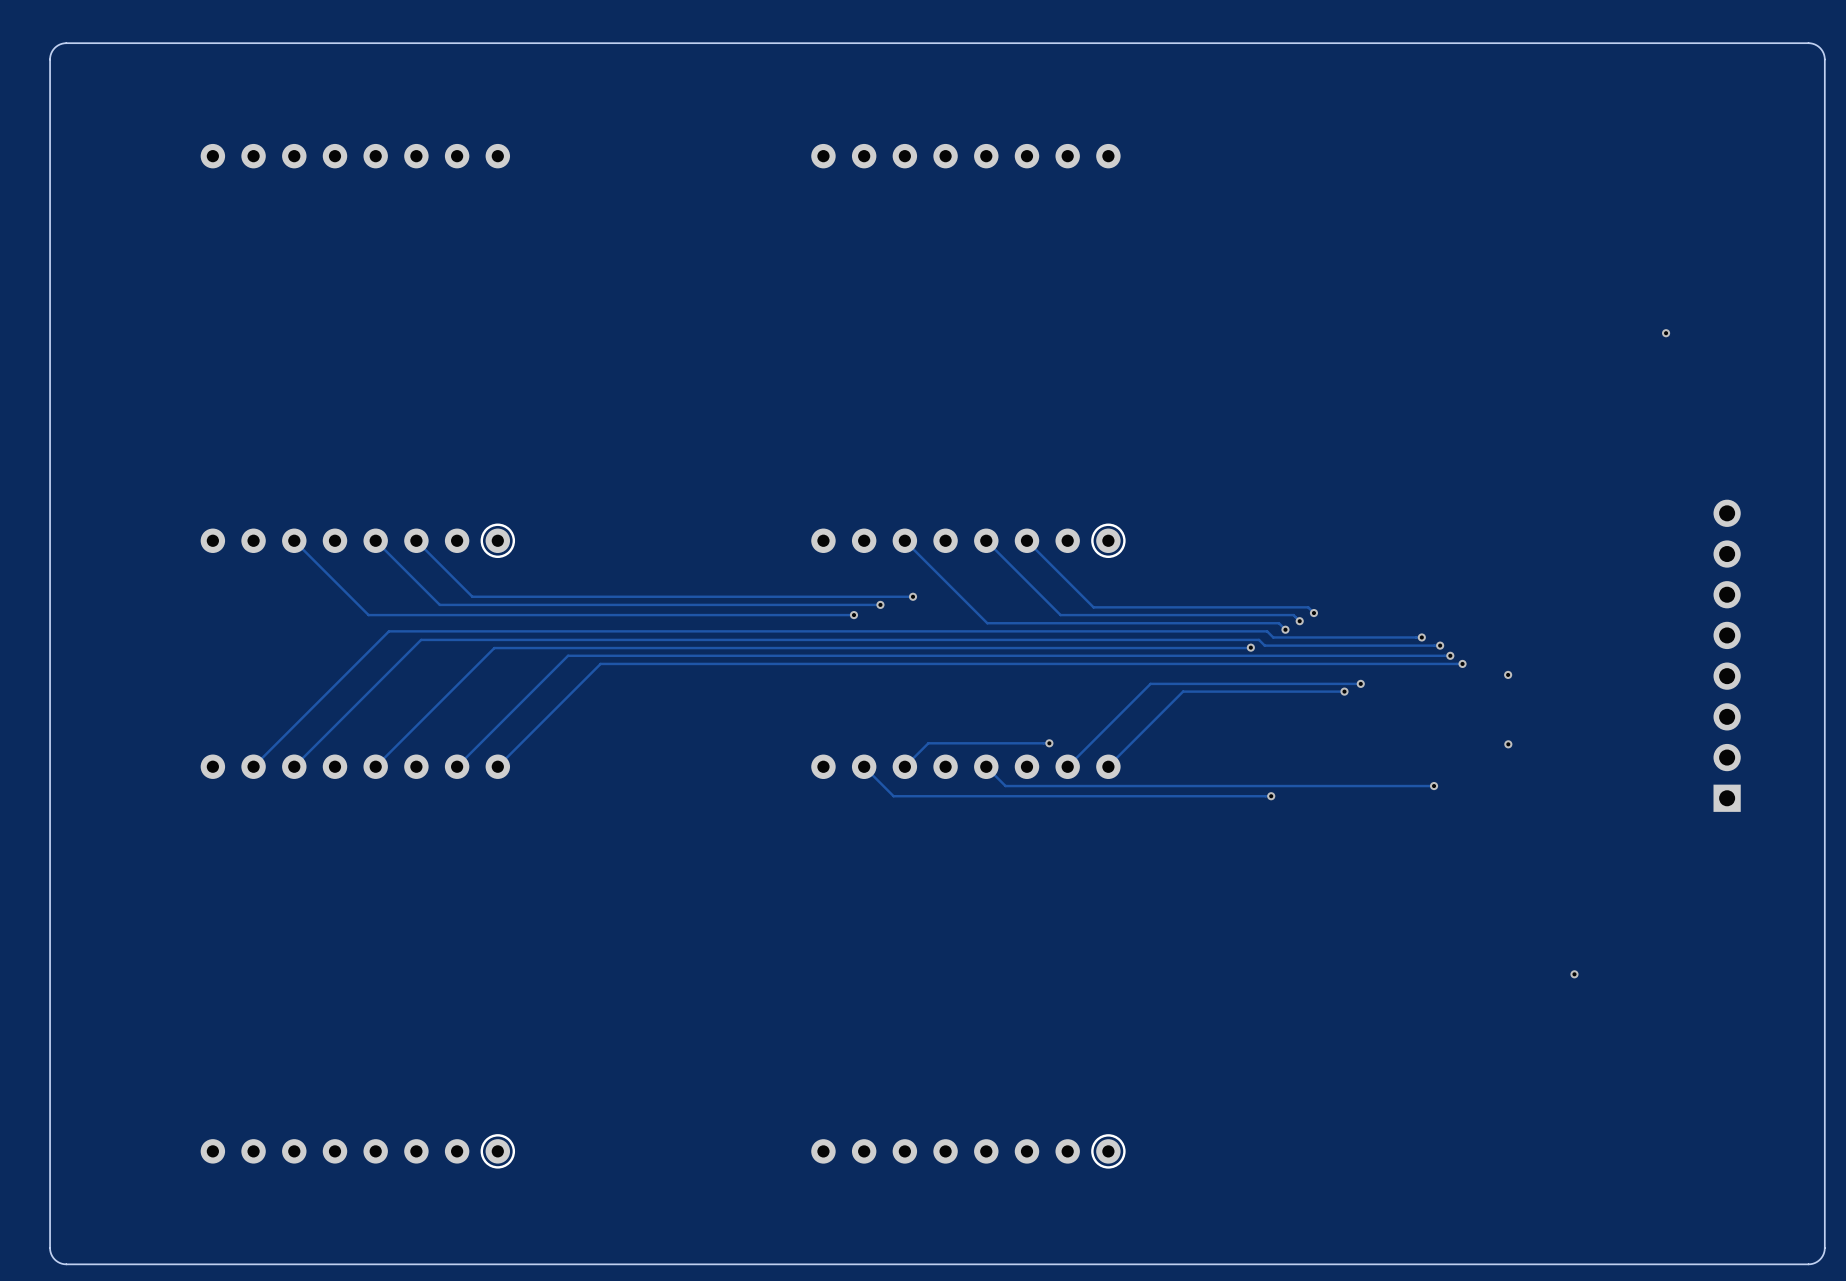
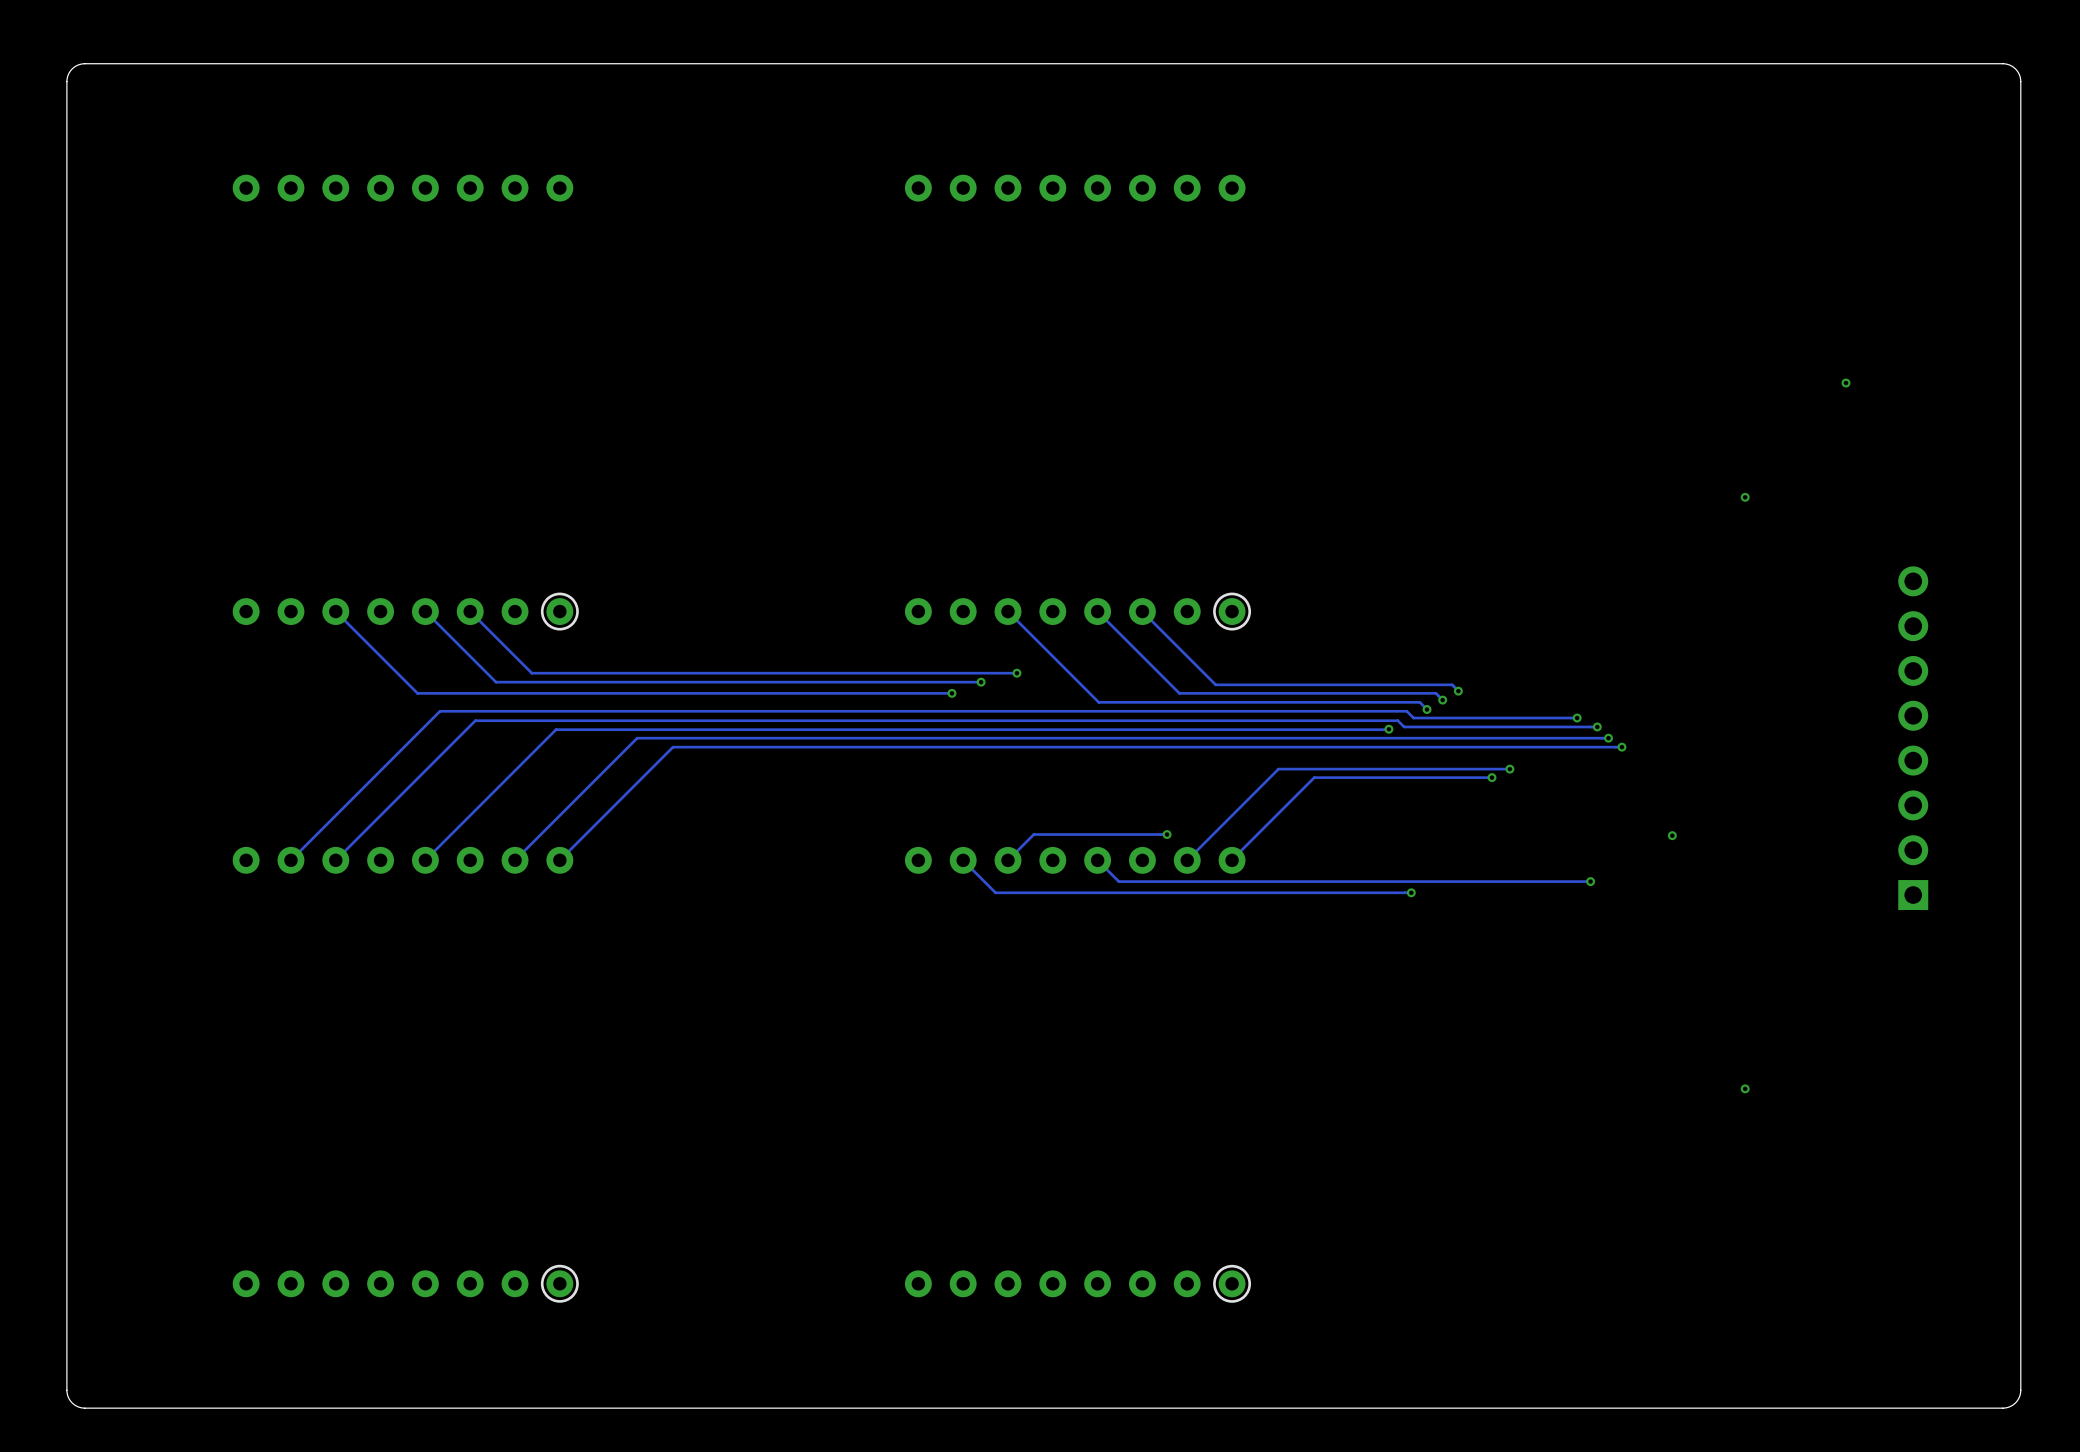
via: none -> (1745, 497)
via: (1508, 674) -> none

